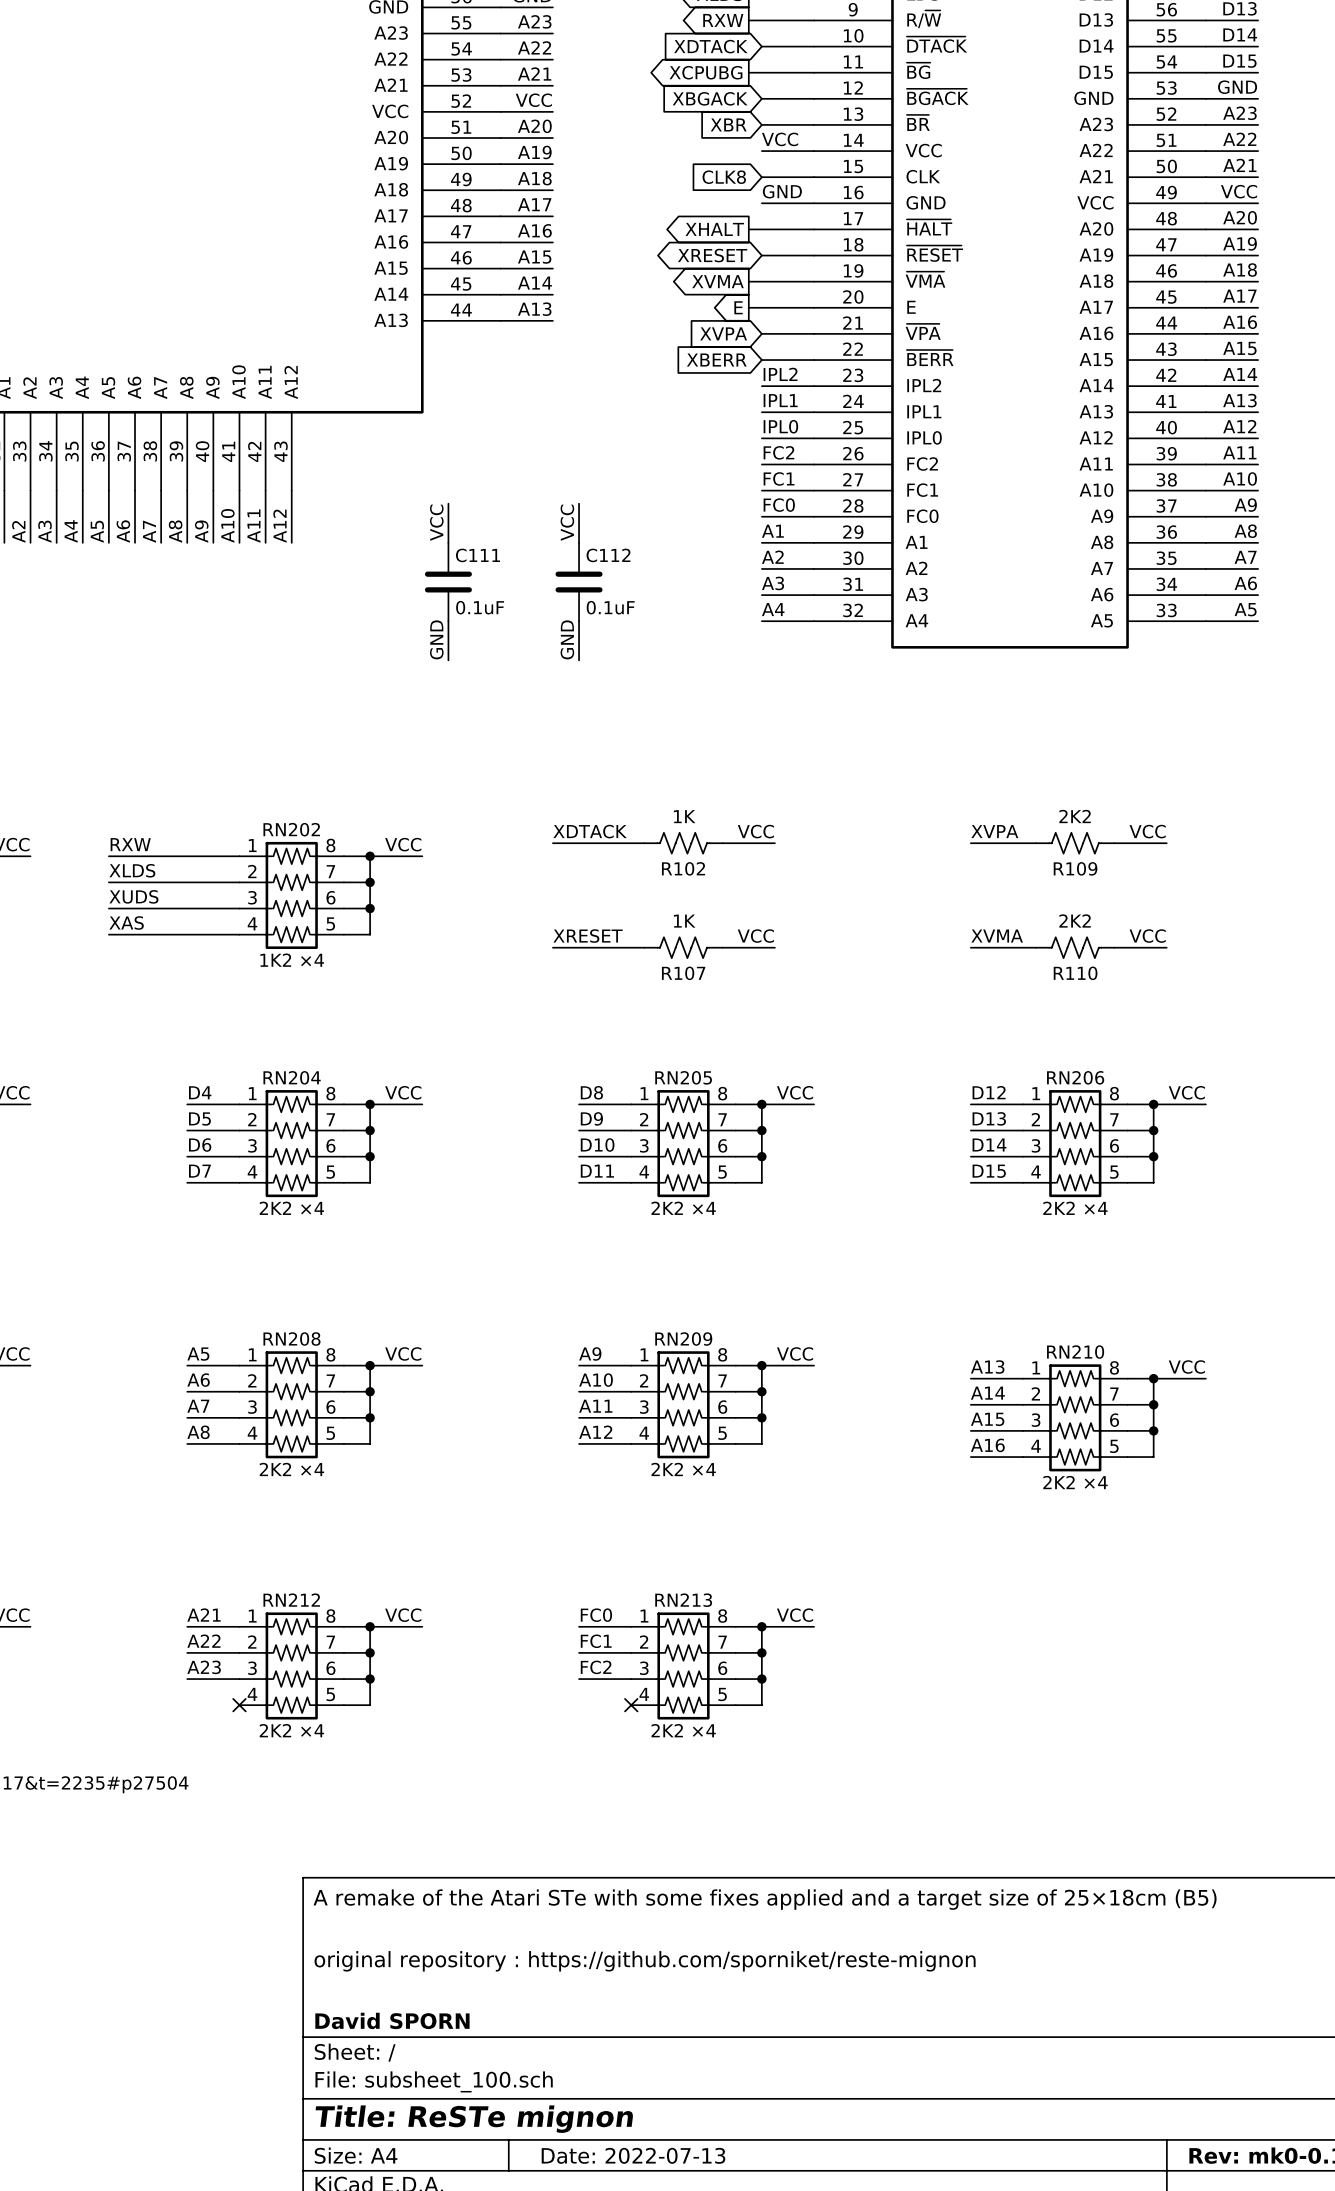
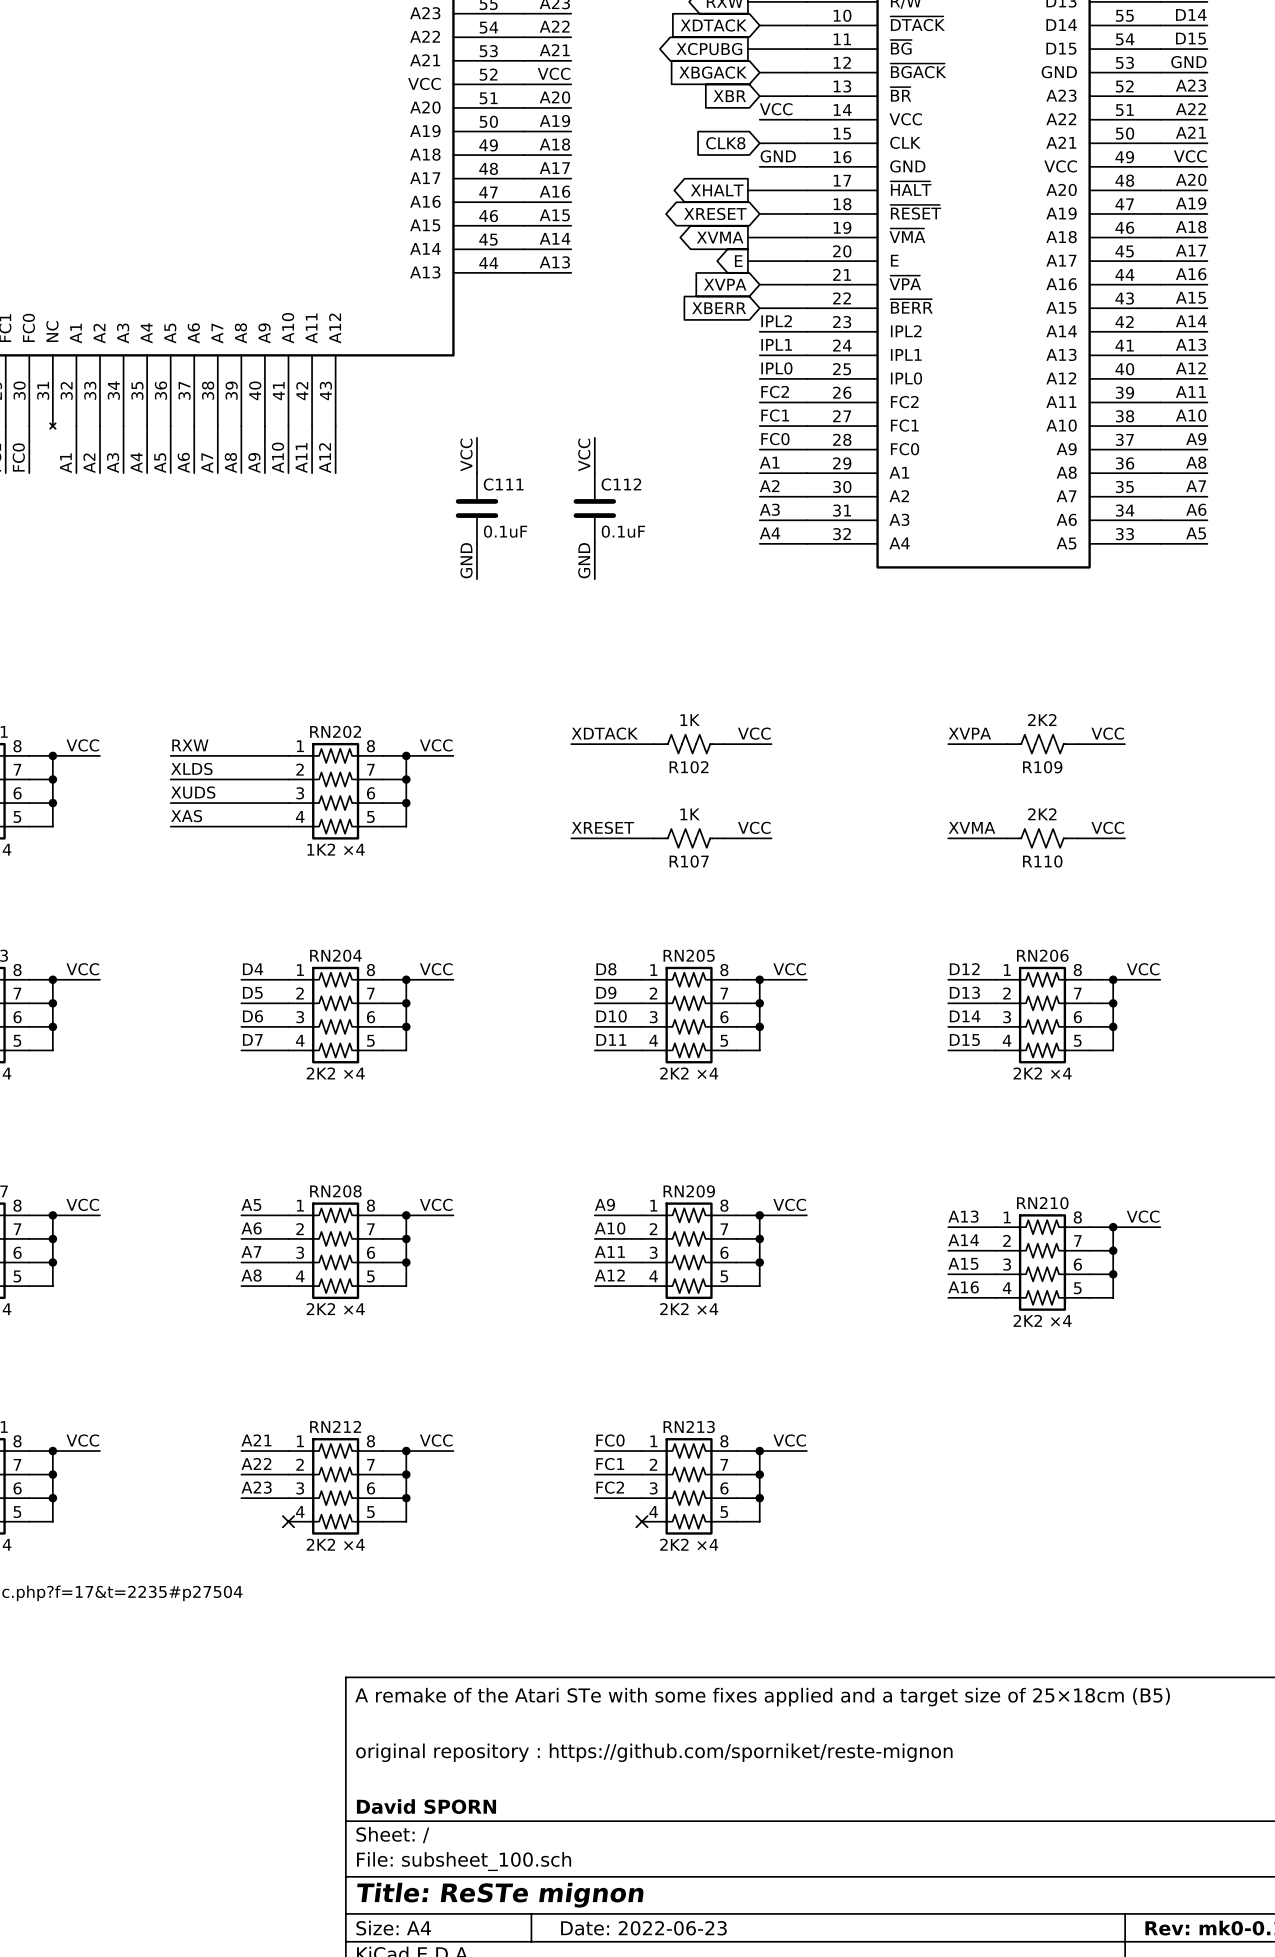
title block: Date: 2022-07-13 (633, 2155) -> Date: 2022-06-23 (643, 1928)

